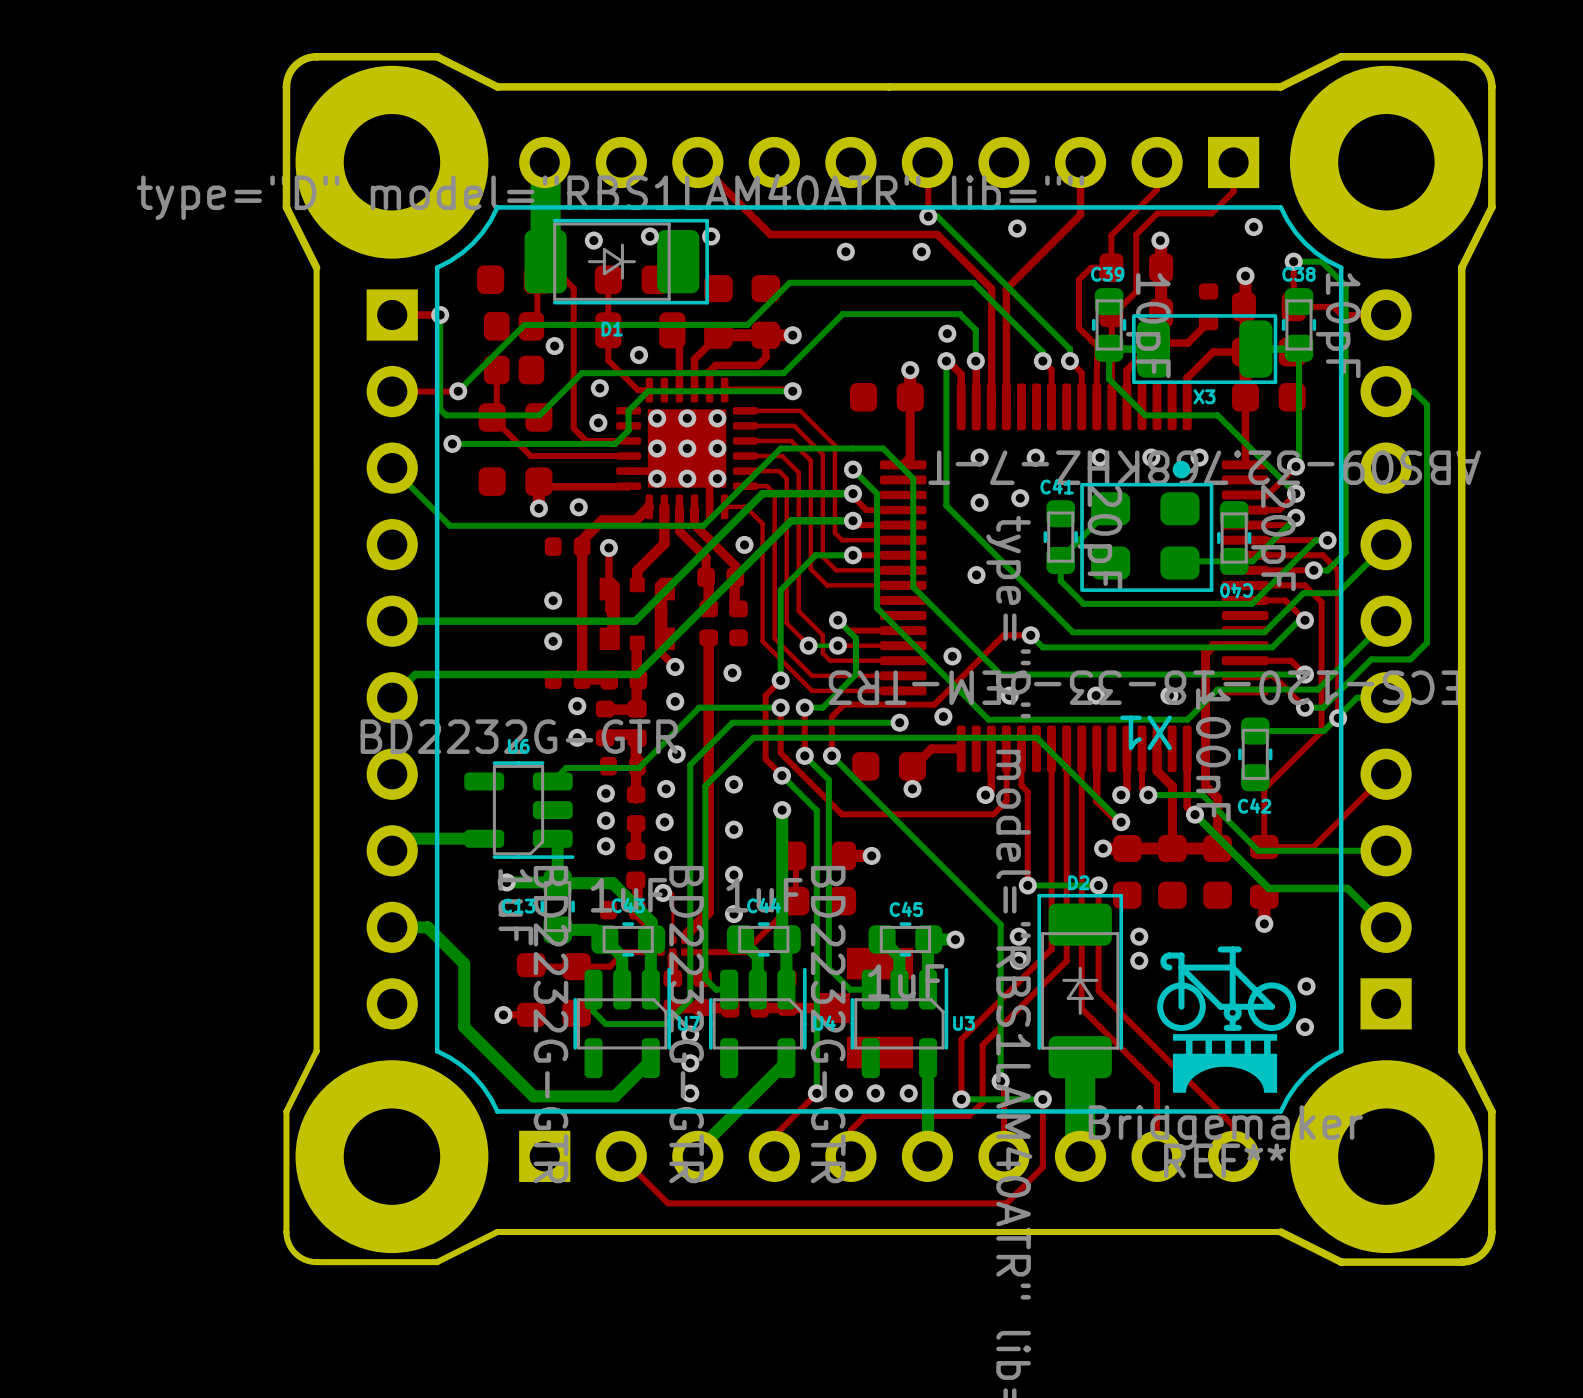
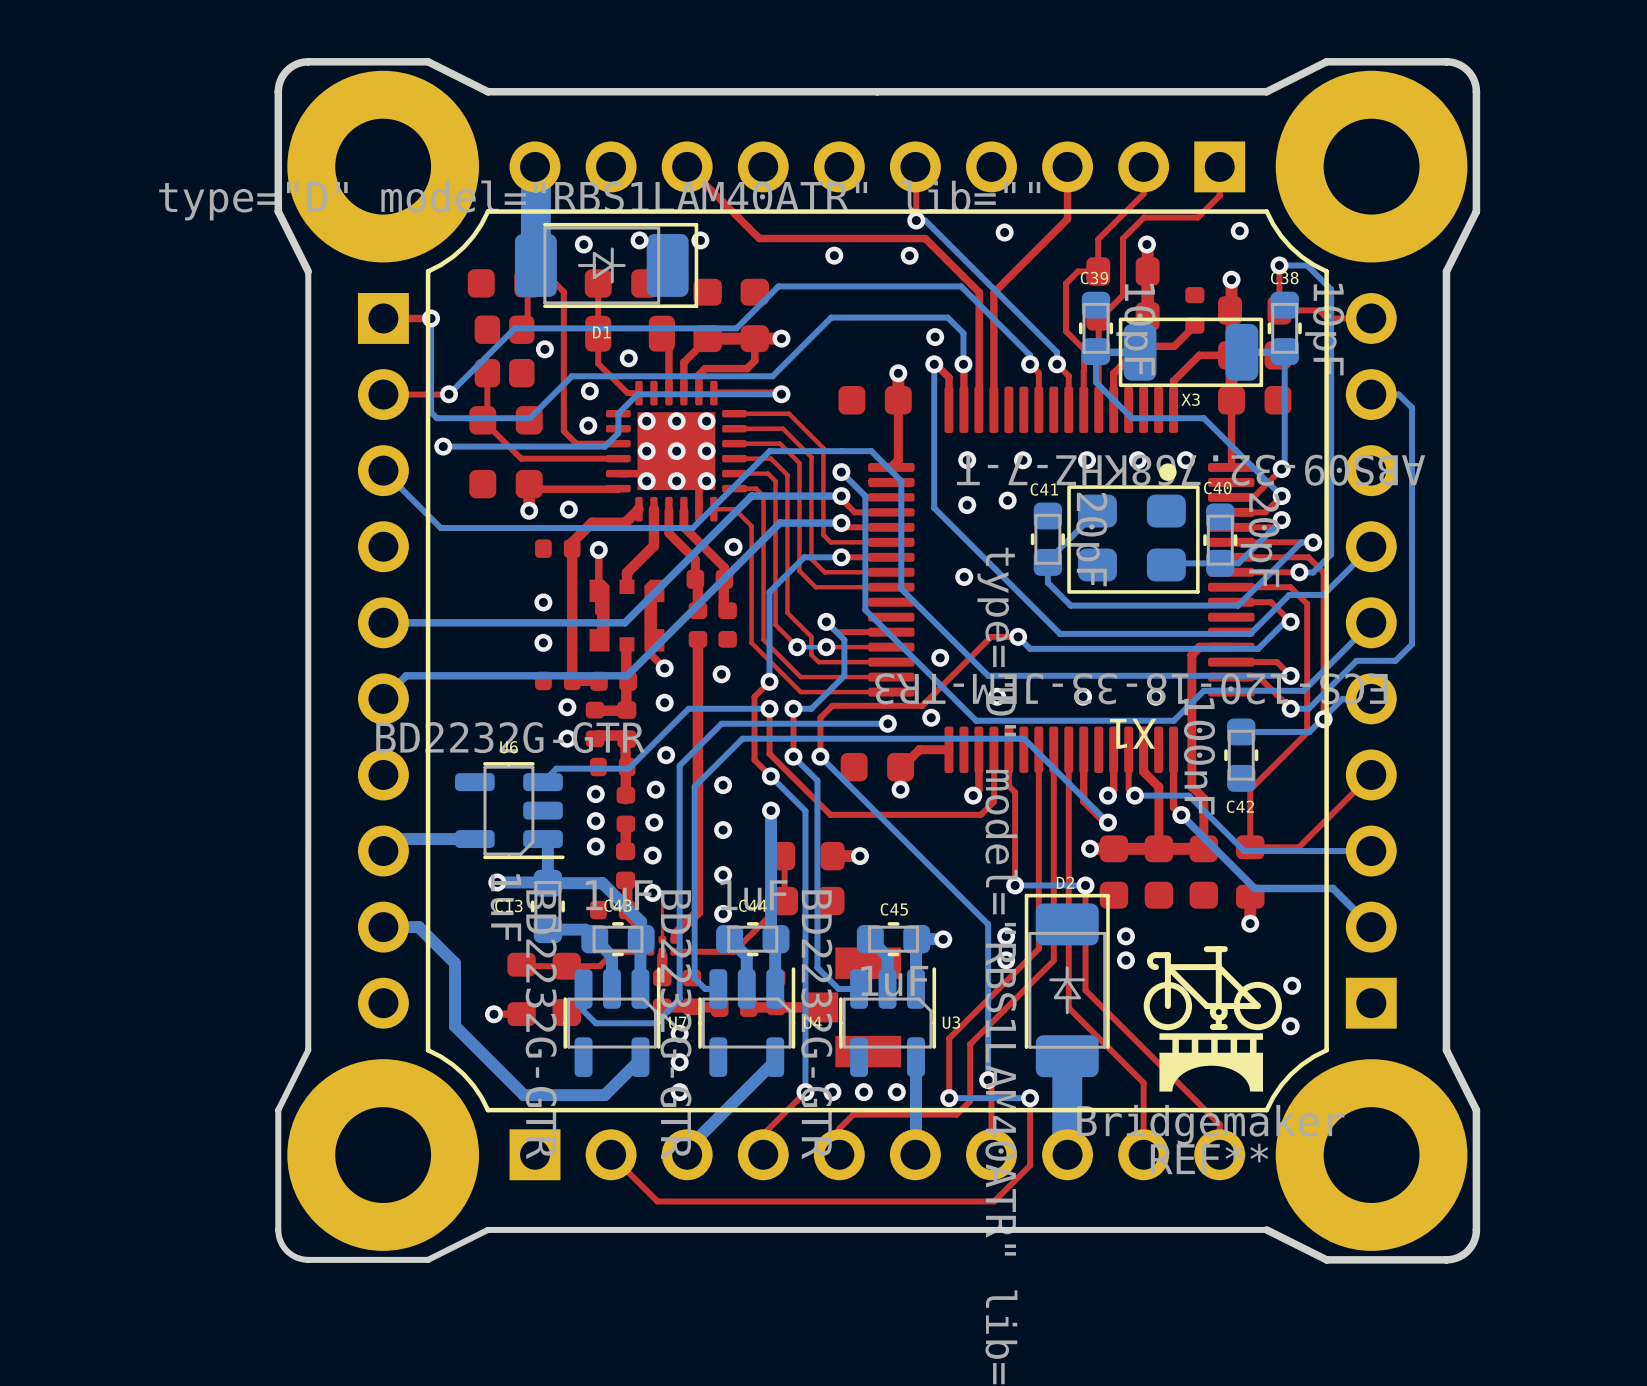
C40 name rotation: 0° (1236, 590) -> 180° (1217, 488)
C40 name position: C40 (1236, 590) -> C40 (1217, 488)

